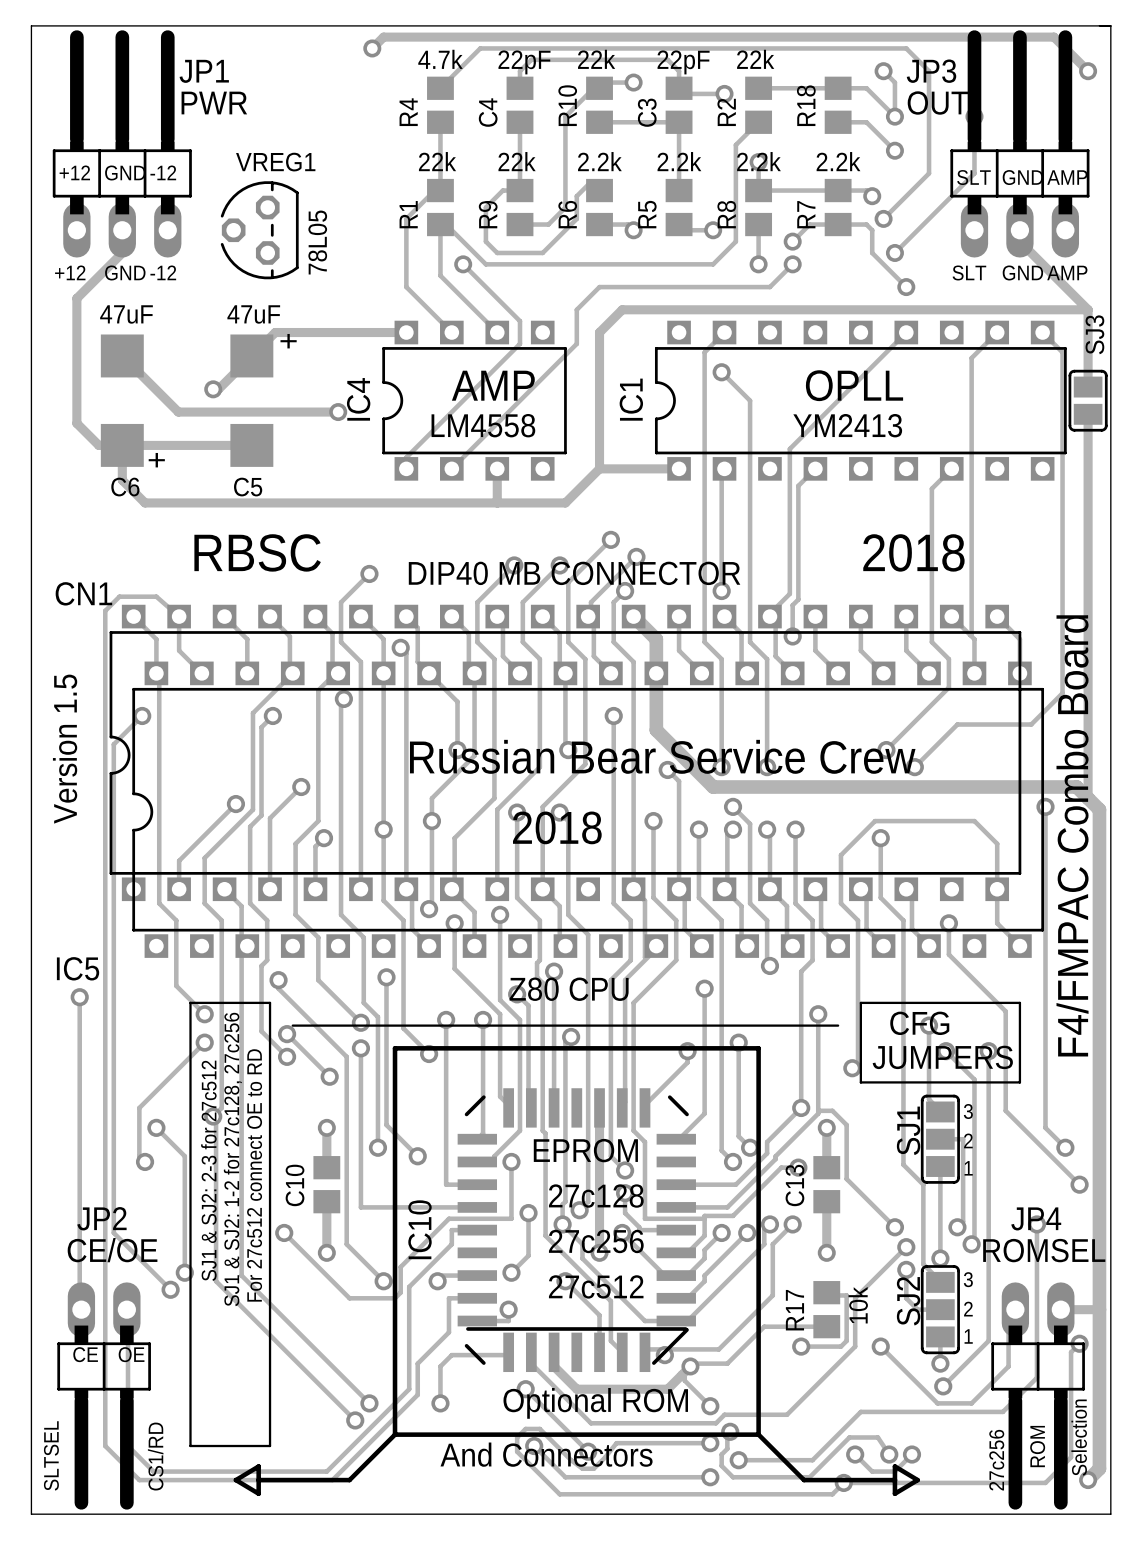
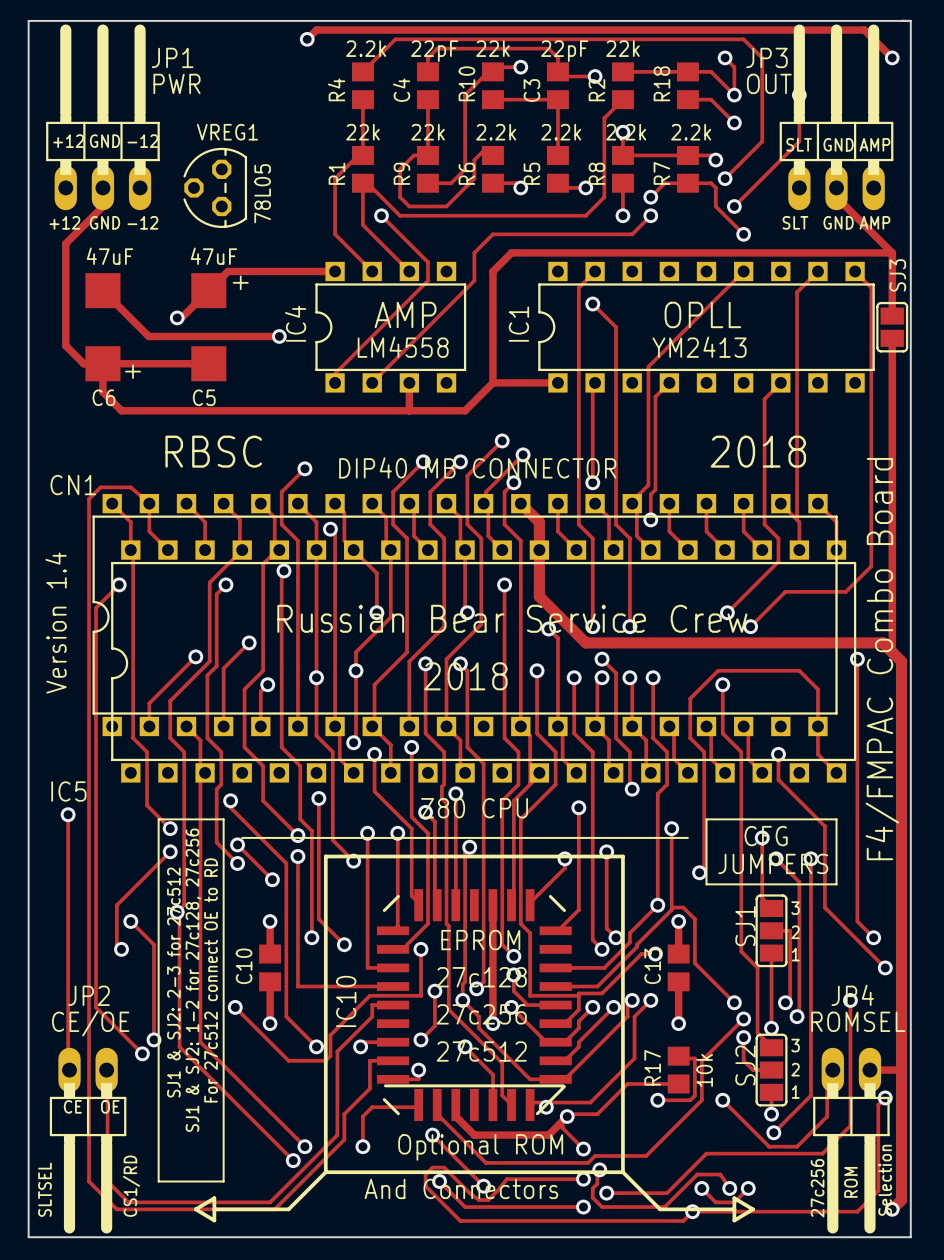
text: 4.7k (440, 59) -> 2.2k (366, 48)
text: Version 1.5 (65, 749) -> Version 1.4 (56, 623)

